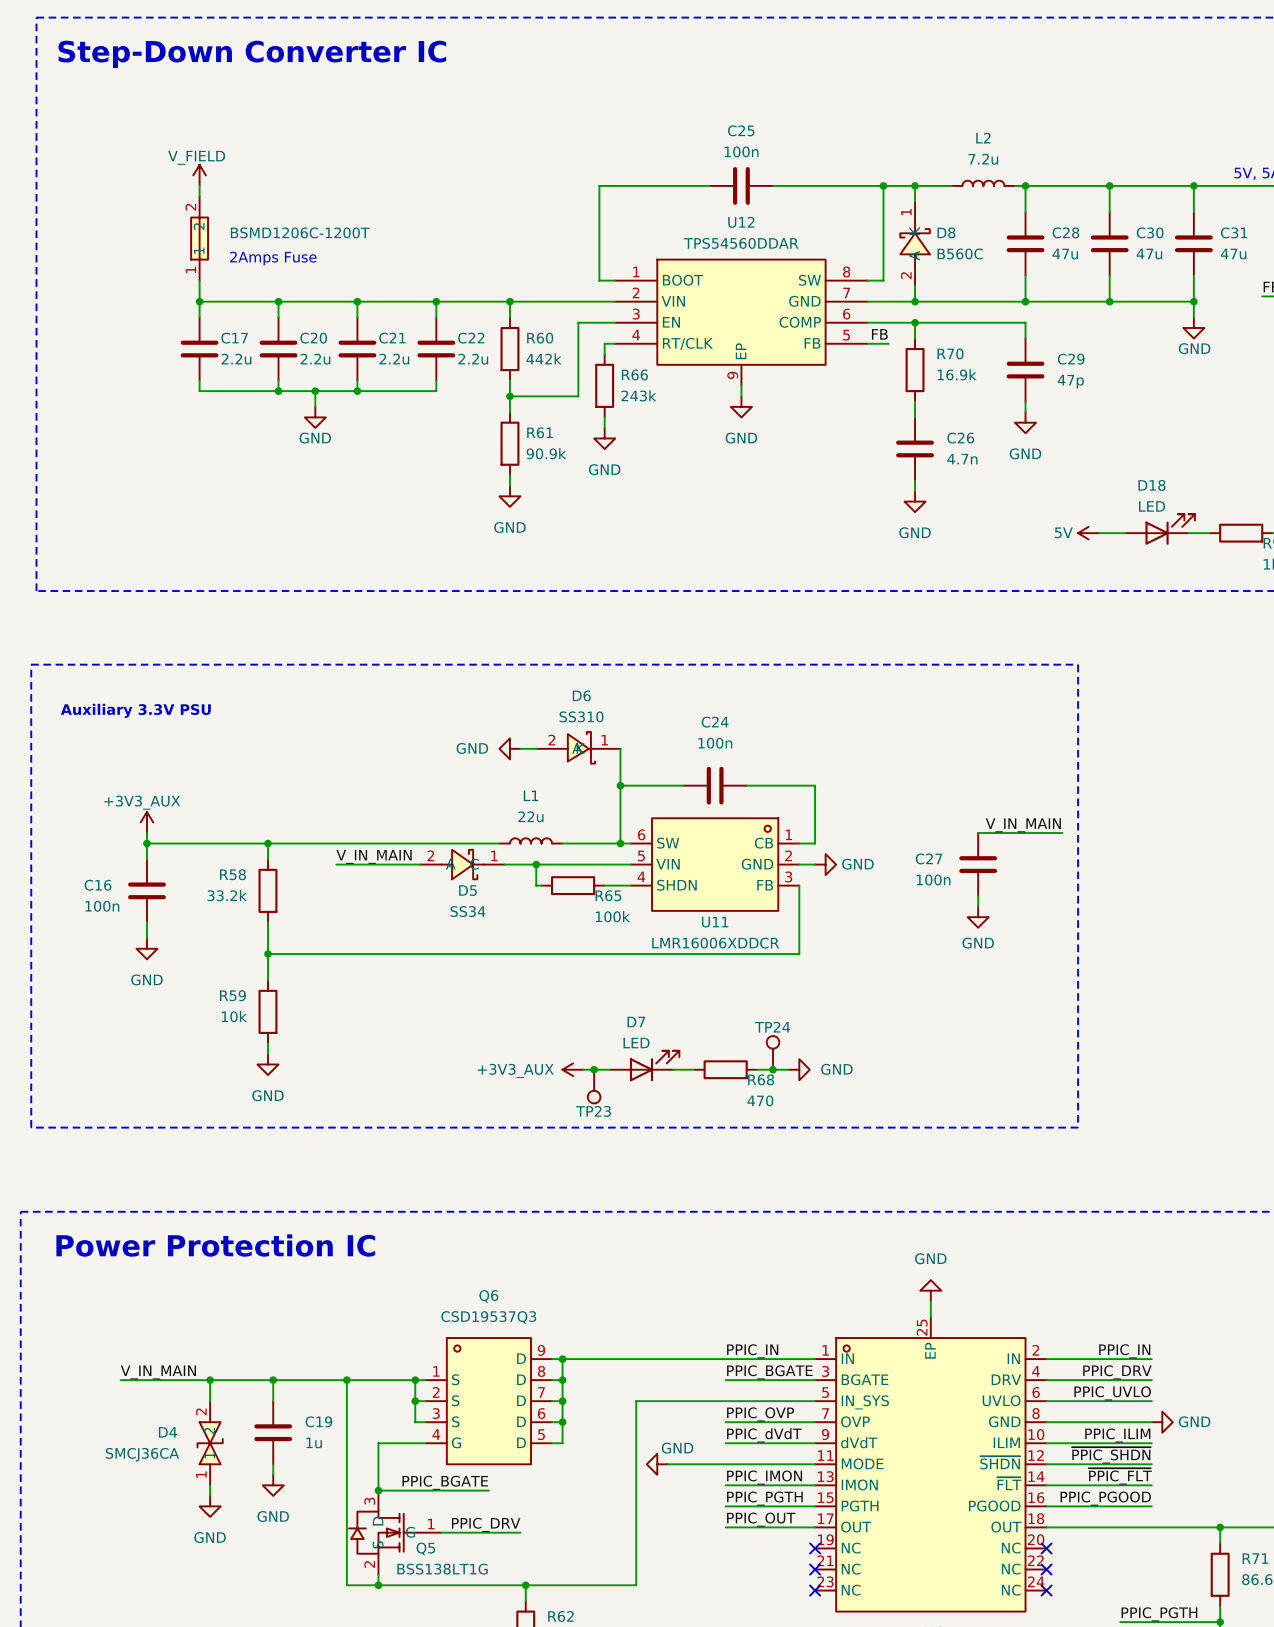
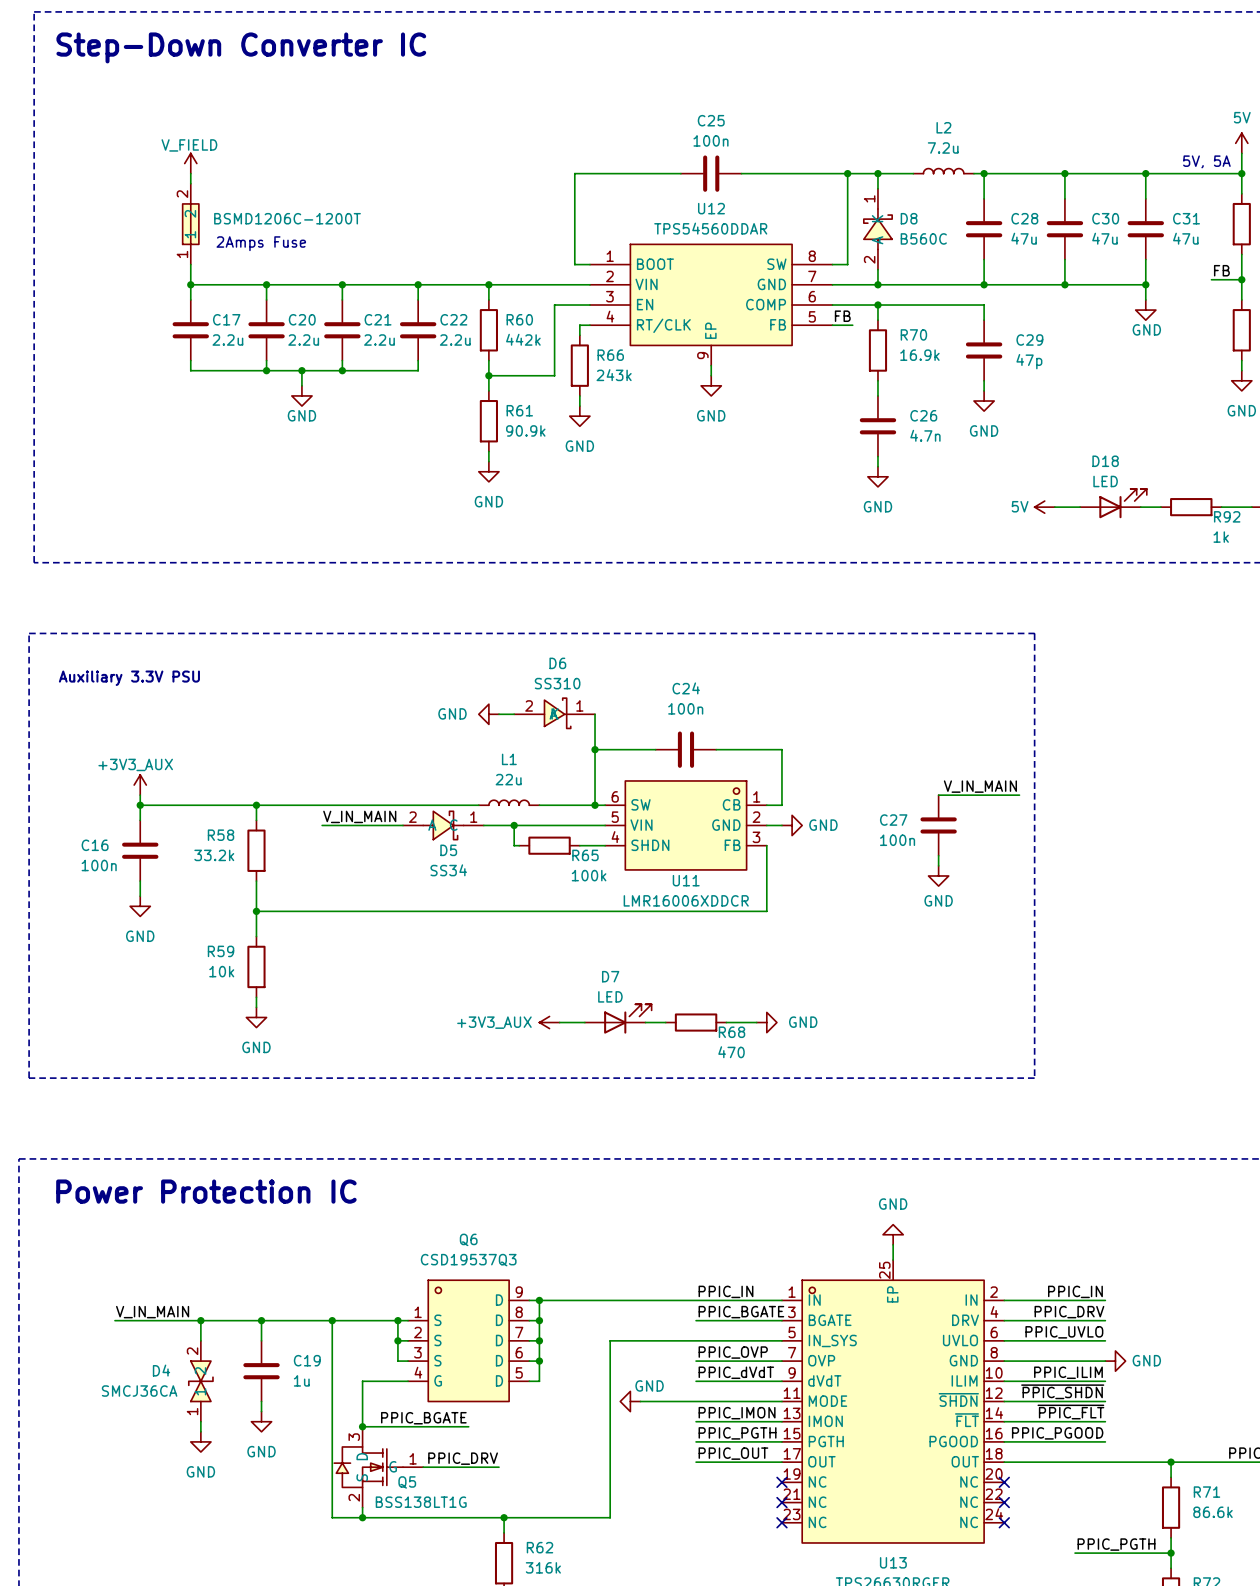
TP24: (773, 1052) -> none
junction: (594, 1069) -> none
junction: (773, 1069) -> none
TP23: (594, 1086) -> none

